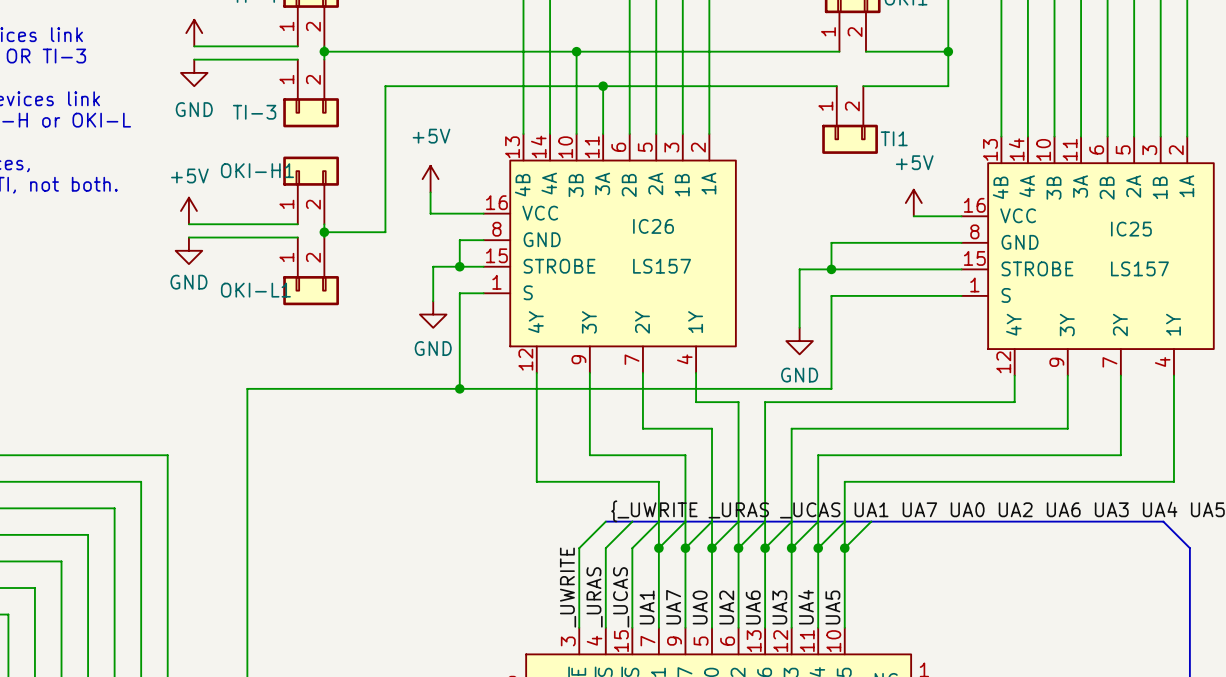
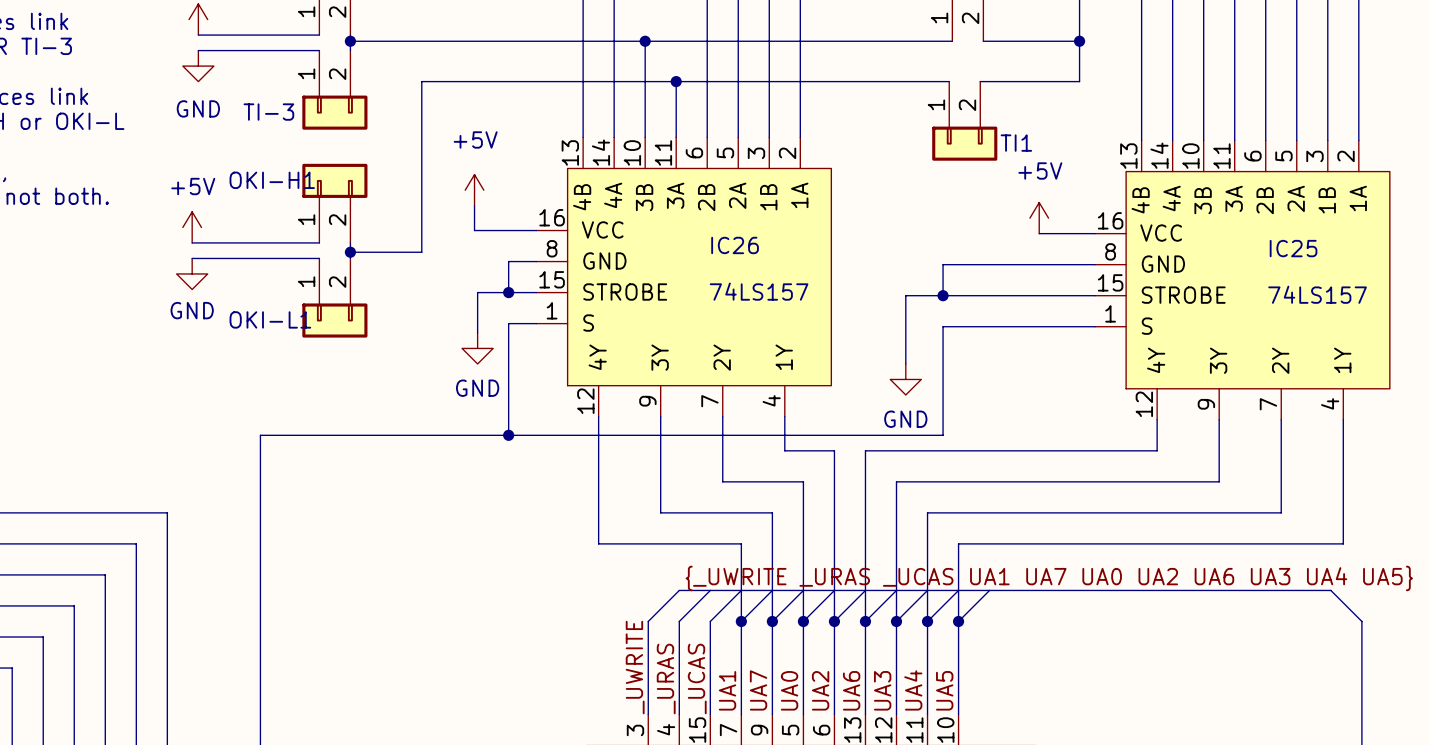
IC26 value: LS157 (662, 266) -> 74LS157 (759, 291)
IC25 value: LS157 (1139, 268) -> 74LS157 (1317, 294)

